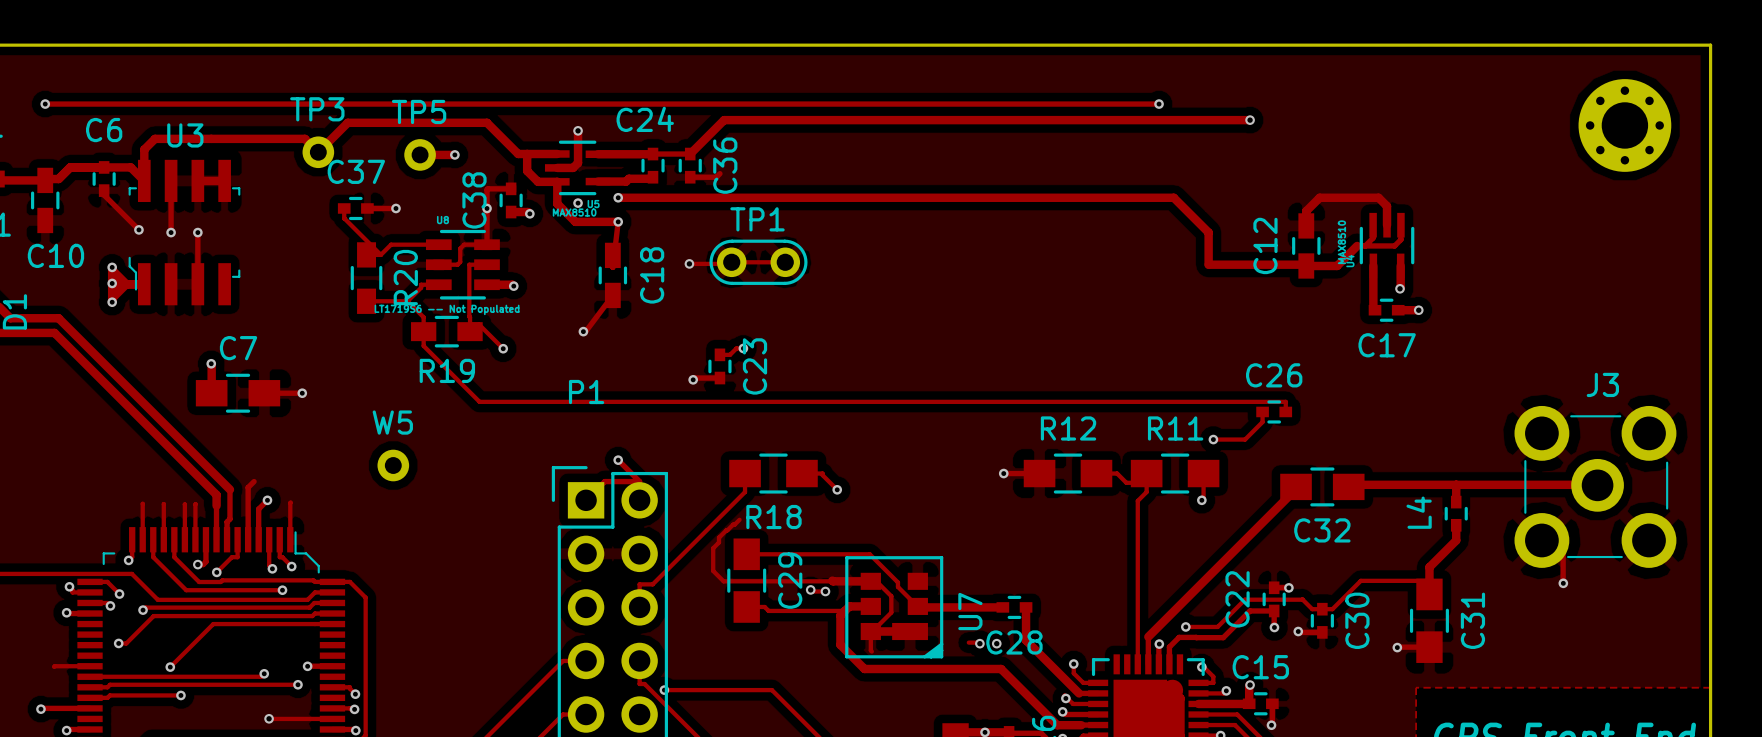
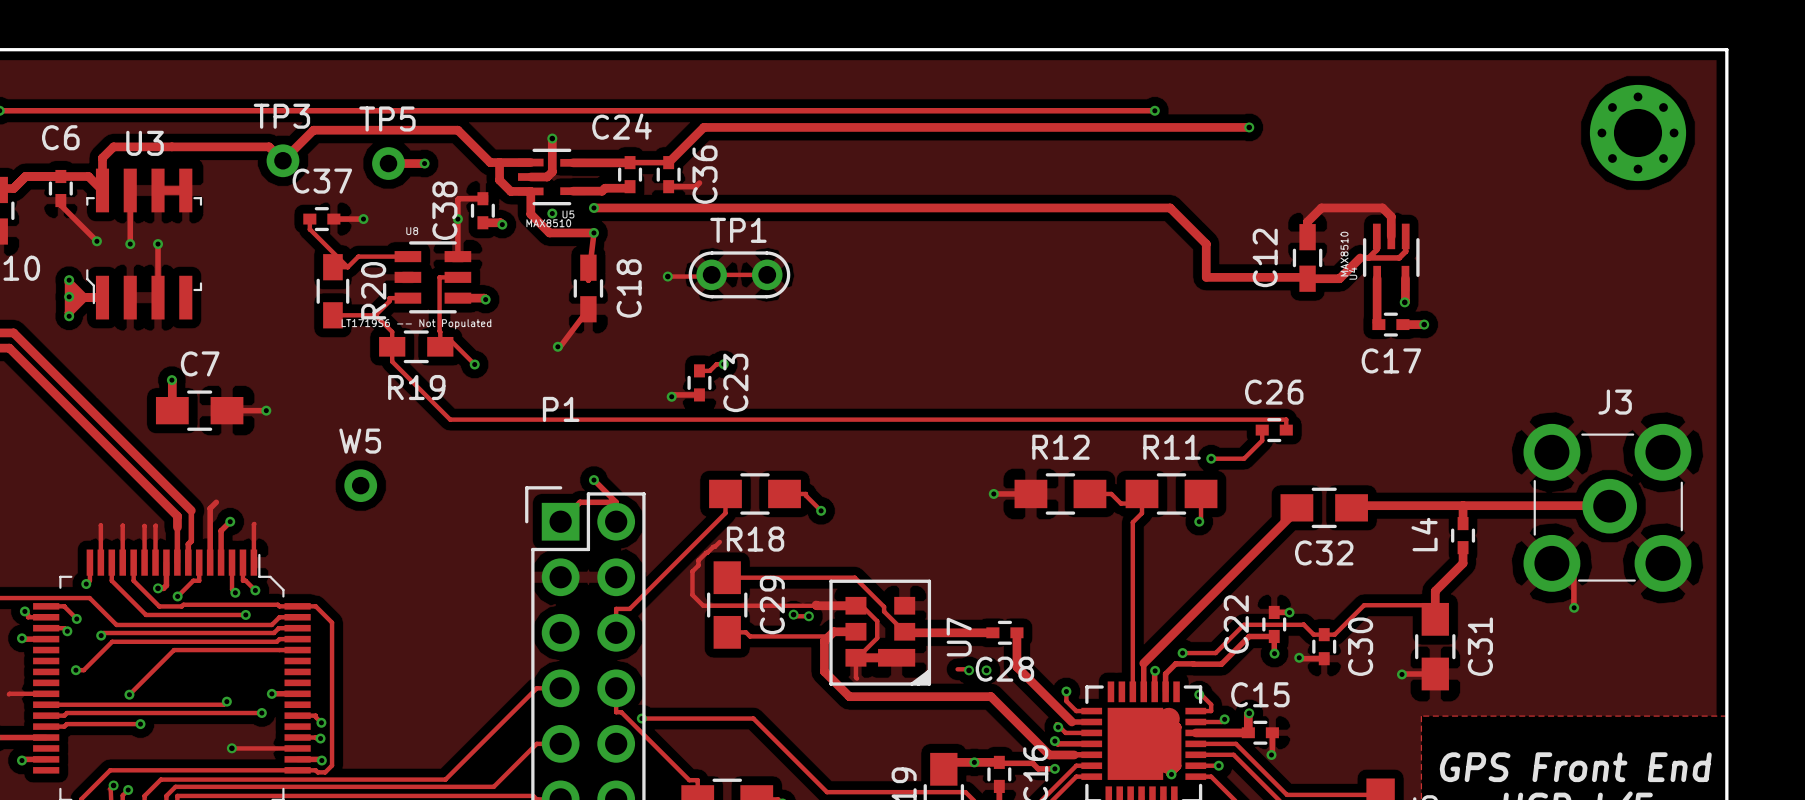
track: (487, 244) (464, 244) (460, 248) (460, 262) (457, 264) (438, 264) -> none

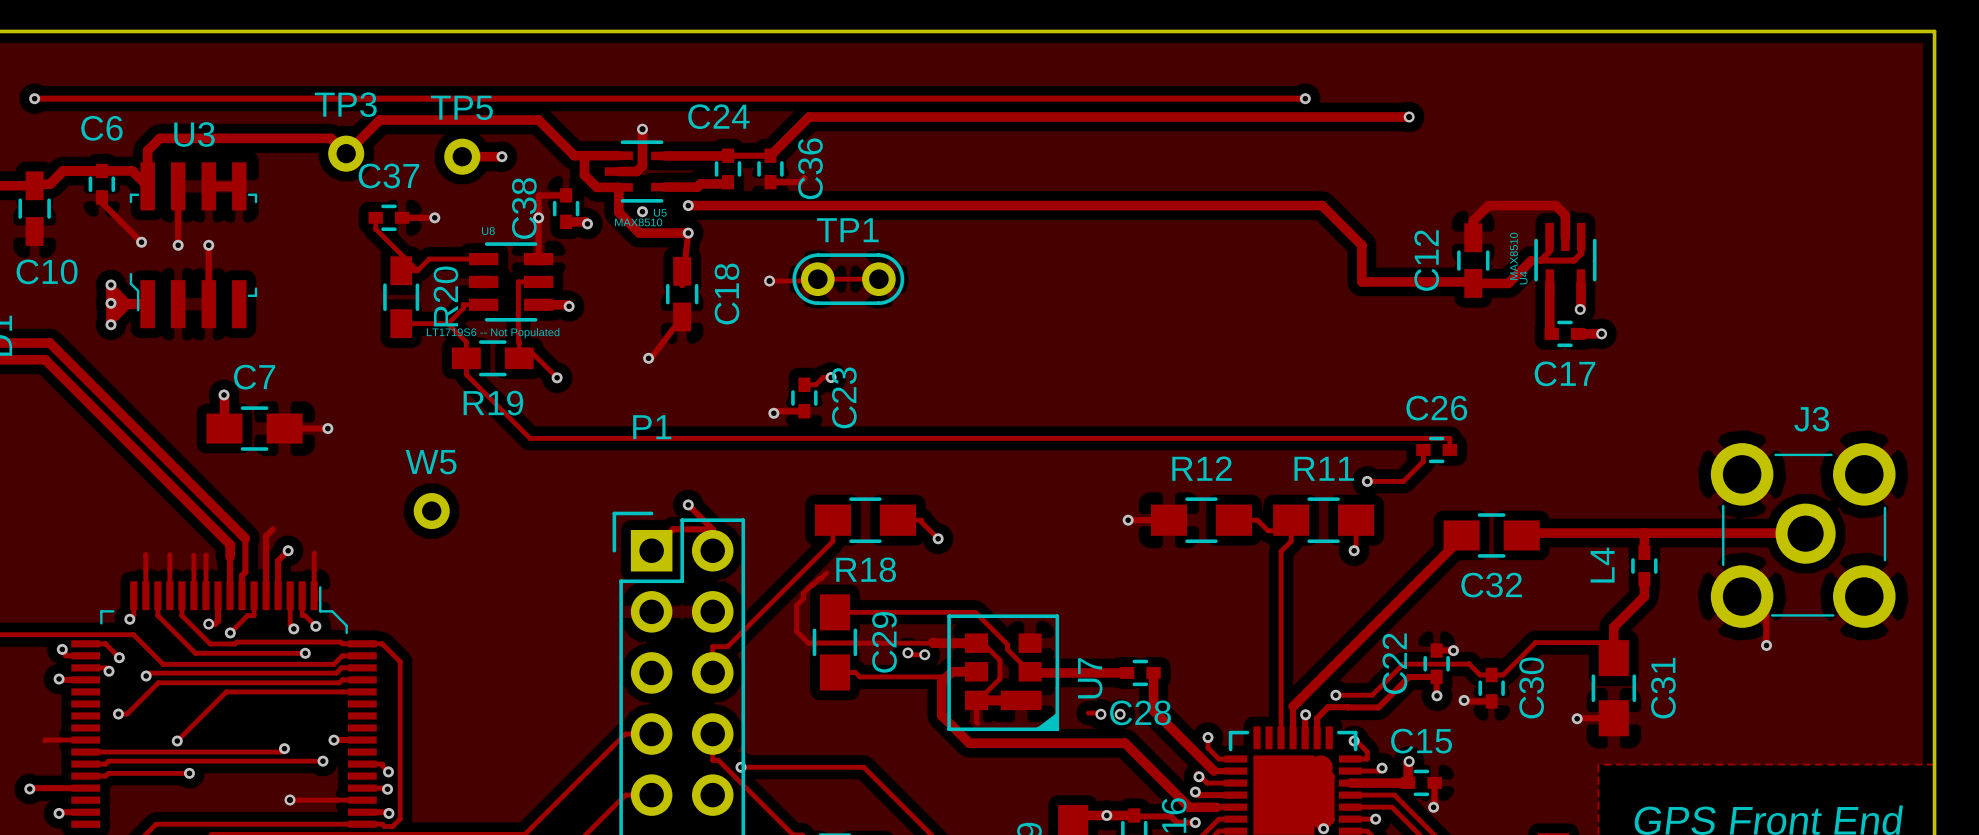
part: (1638, 132) -> none

